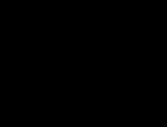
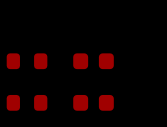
part: none -> (27, 61)
part: none -> (93, 61)
part: none -> (27, 102)
part: none -> (93, 102)

